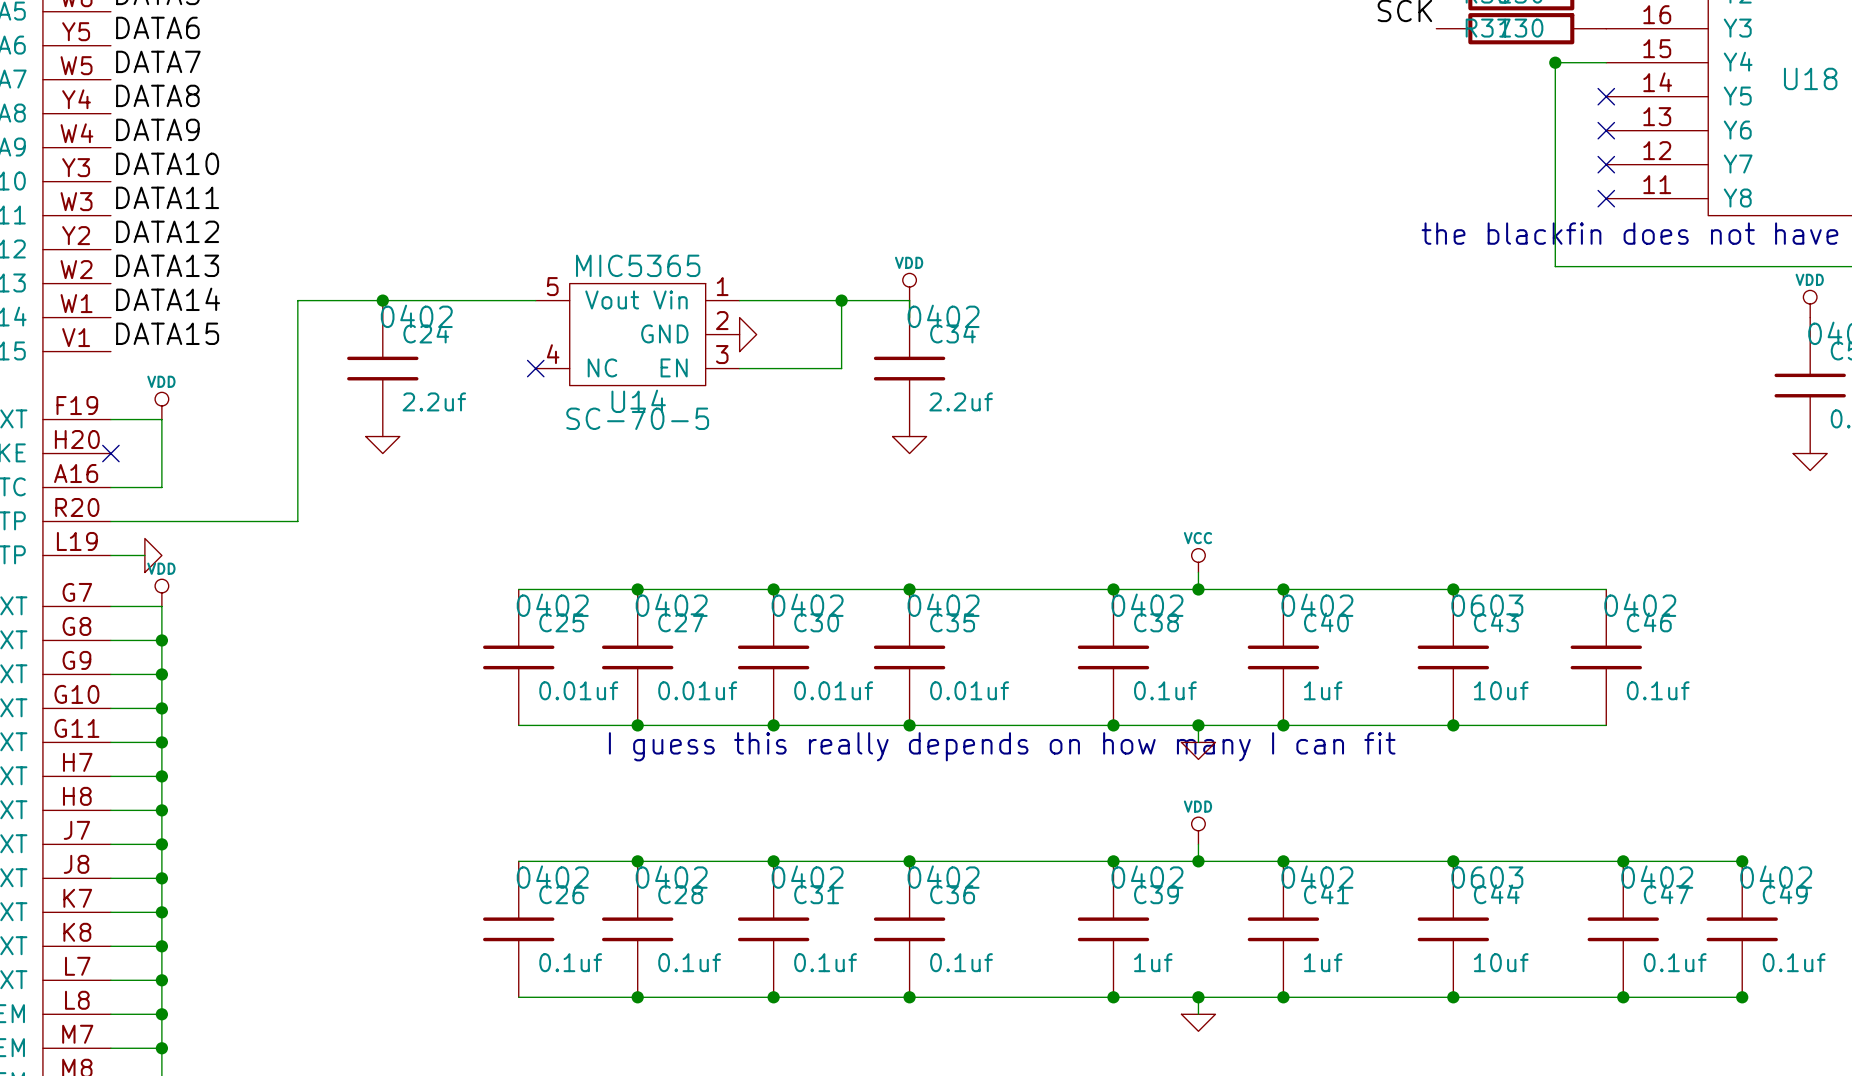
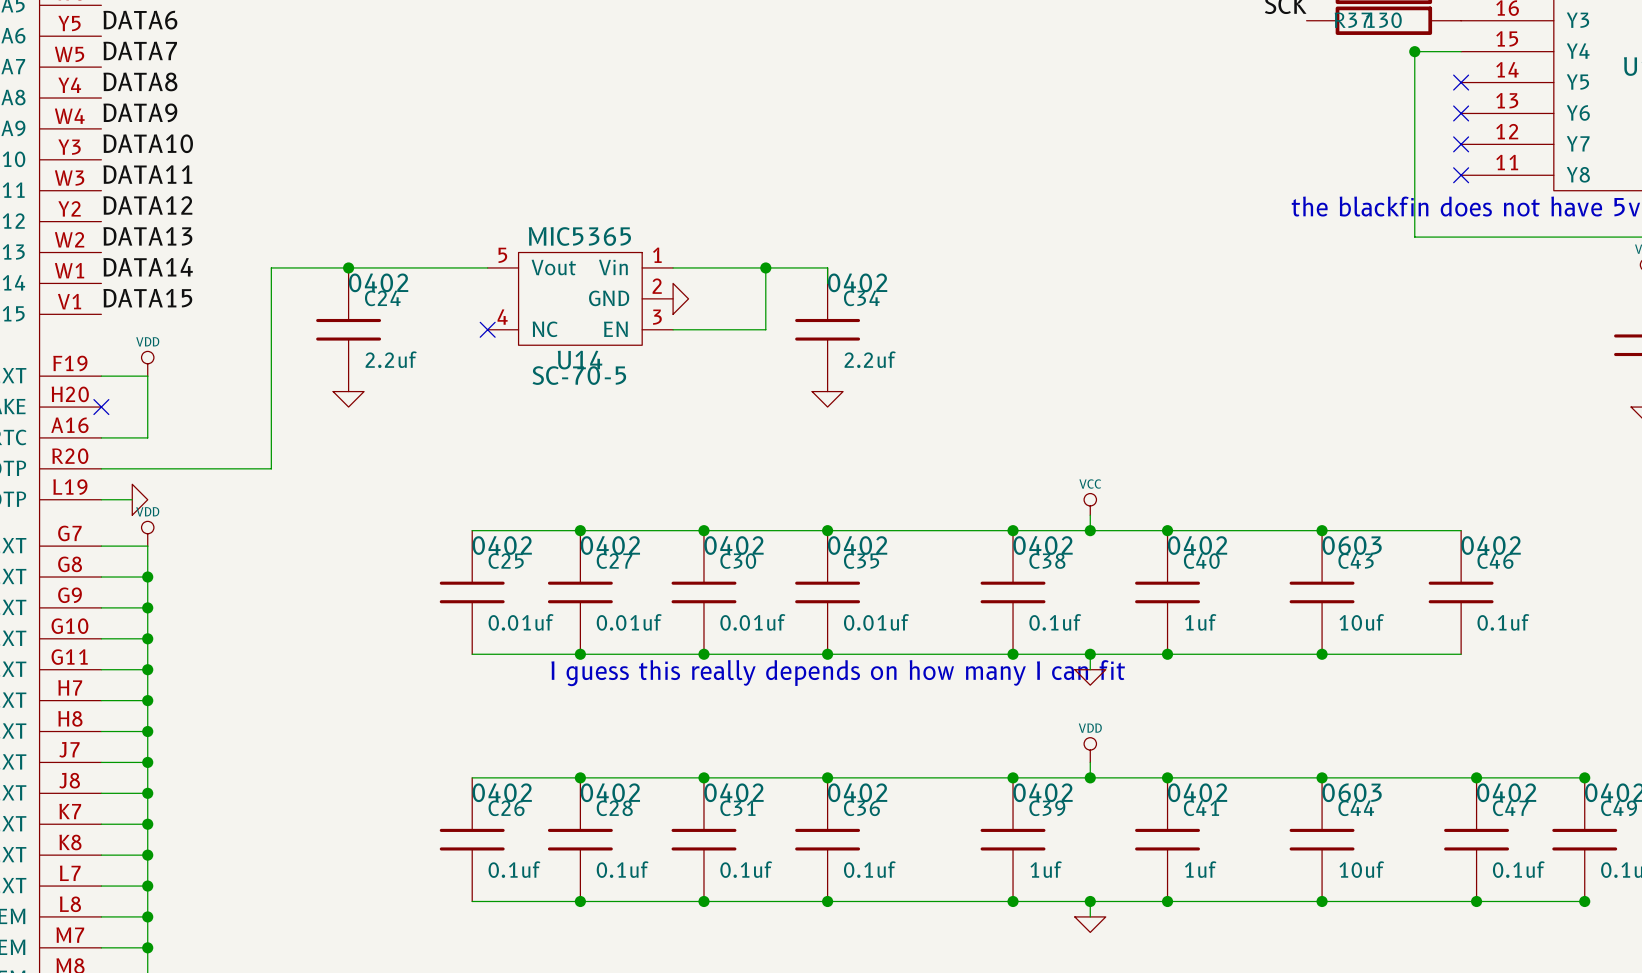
power symbol: VDD (909, 287) -> none

